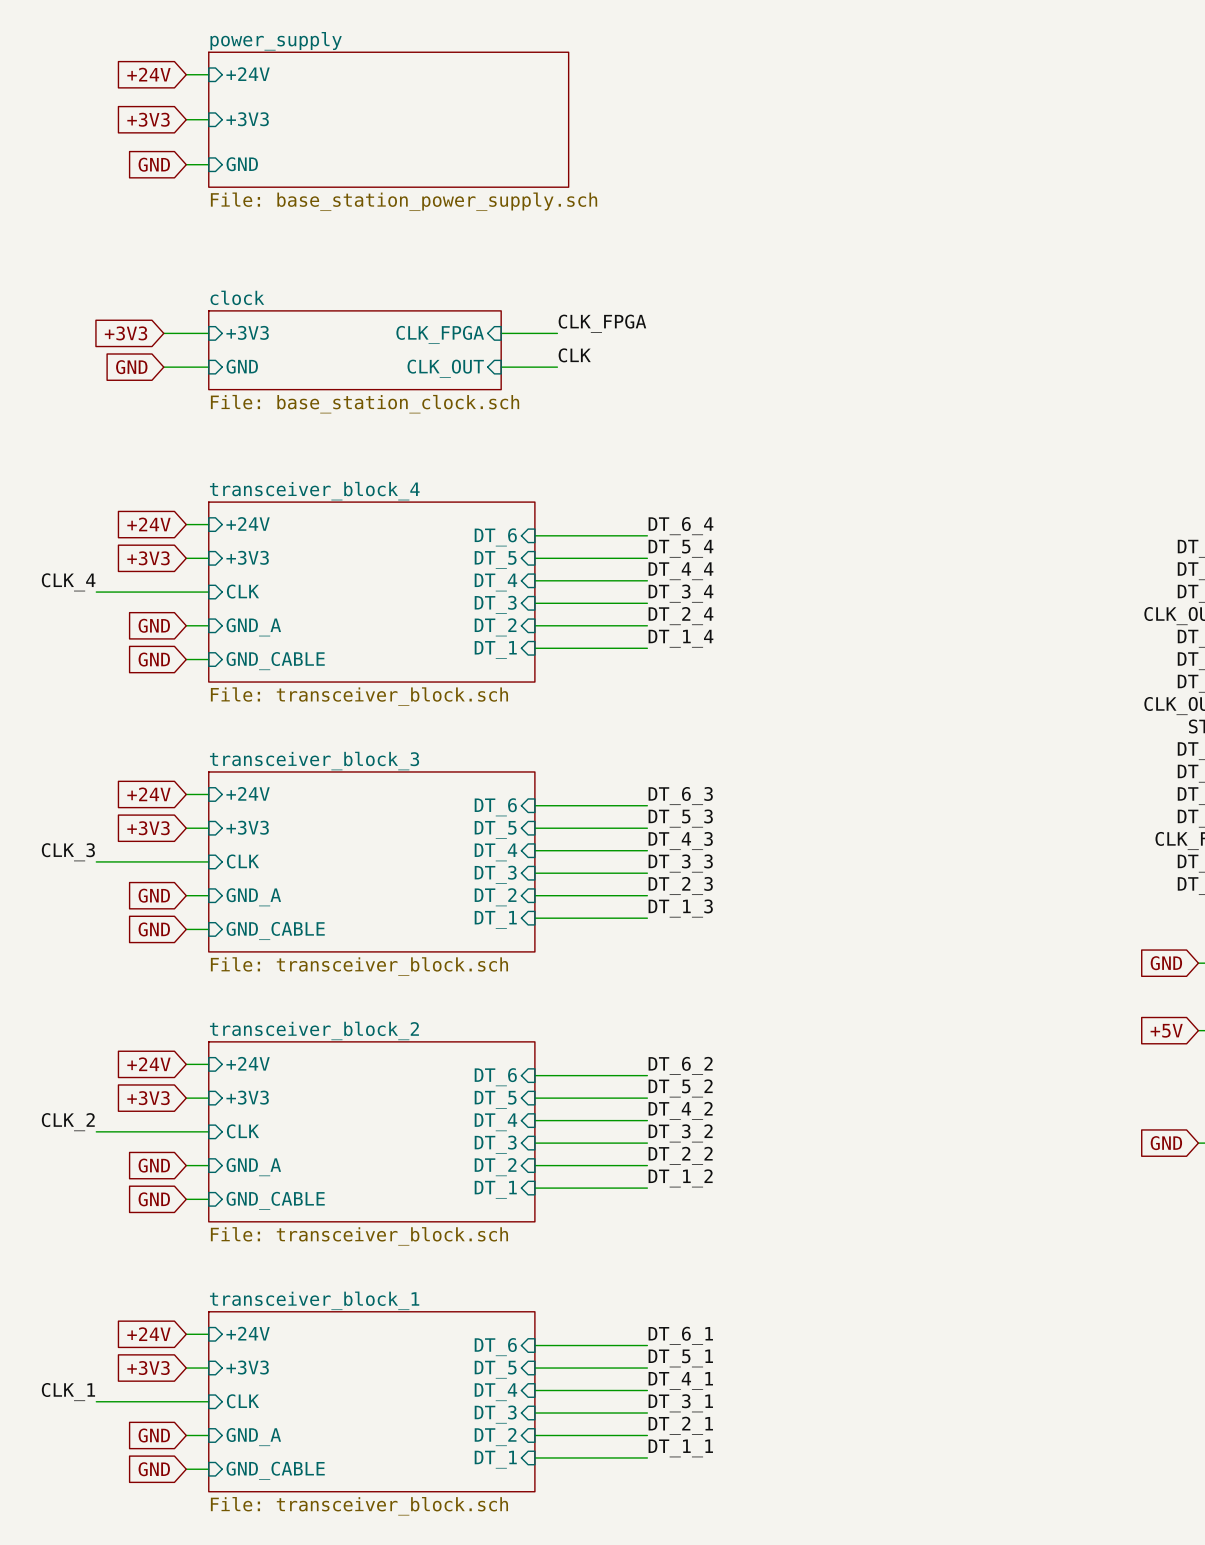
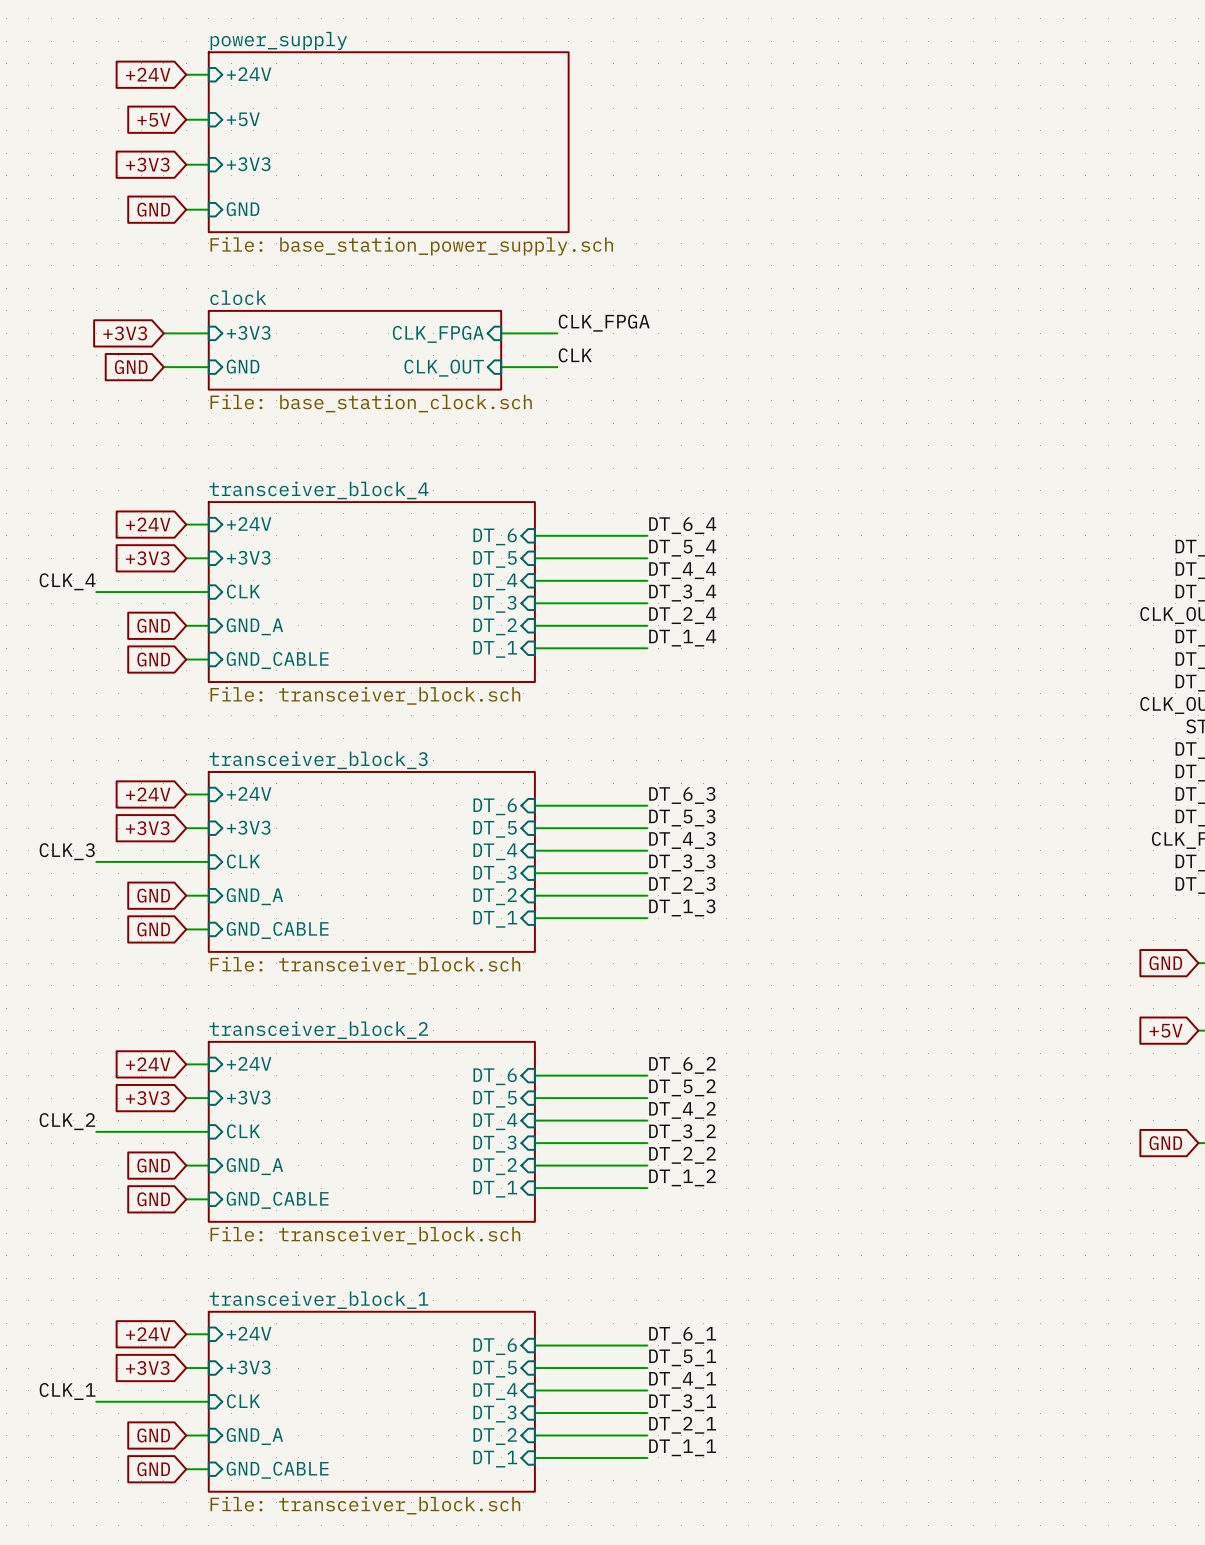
global label: +3V3 (148, 119) -> +5V (153, 119)
sheet pin: +3V3 (247, 119) -> +5V (243, 119)
sheet power_supply: File: base_station_power_supply.sch (388, 119) -> none
sheet power_supply: none -> File: base_station_power_supply.sch (388, 142)
global label: GND (154, 164) -> +3V3 (147, 164)
sheet pin: GND (242, 164) -> +3V3 (248, 164)
global label: none -> GND (153, 209)
wire: none -> (186, 209) (208, 209)
sheet pin: none -> GND (243, 209)

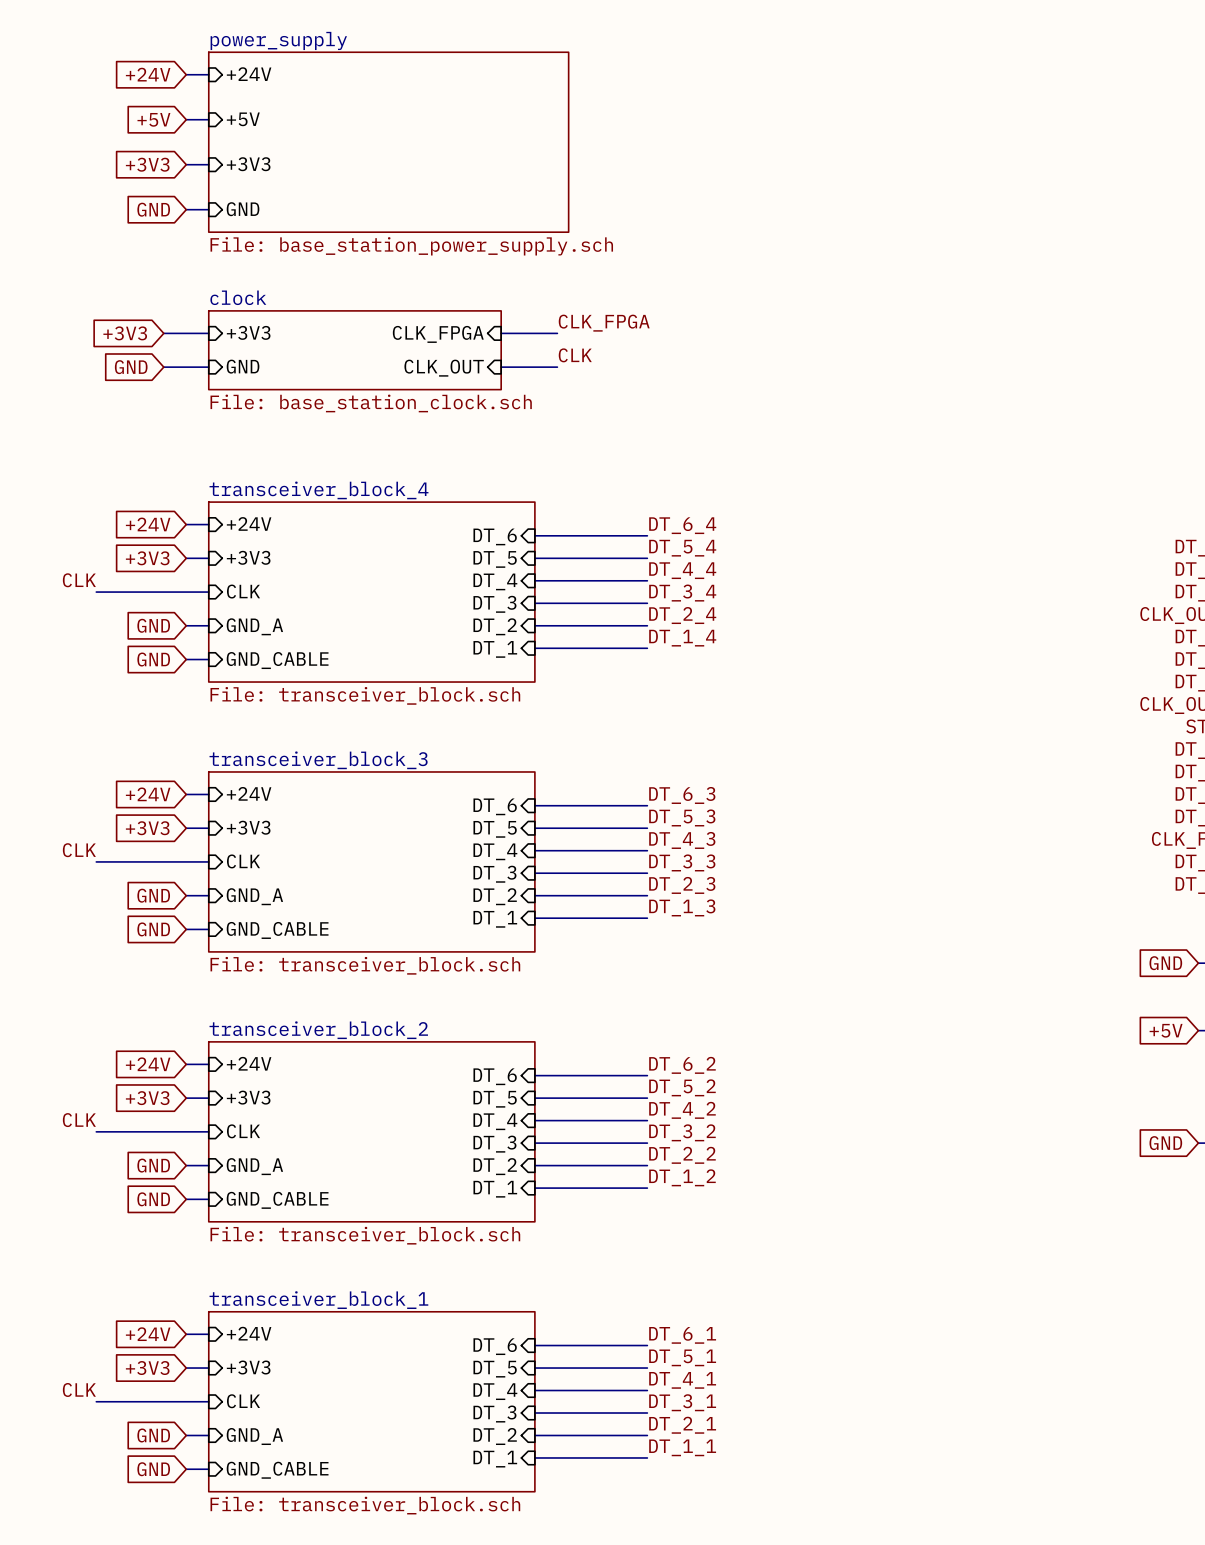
label: CLK_4 (67, 581) -> CLK (79, 580)
label: CLK_3 (67, 851) -> CLK (79, 850)
label: CLK_2 (67, 1121) -> CLK (79, 1120)
label: CLK_1 (67, 1391) -> CLK (79, 1389)

